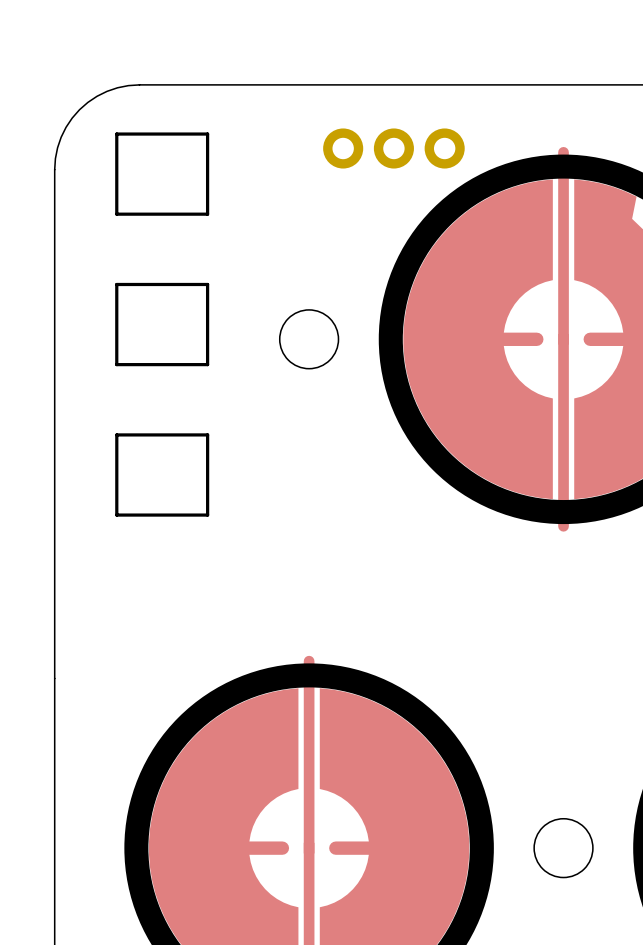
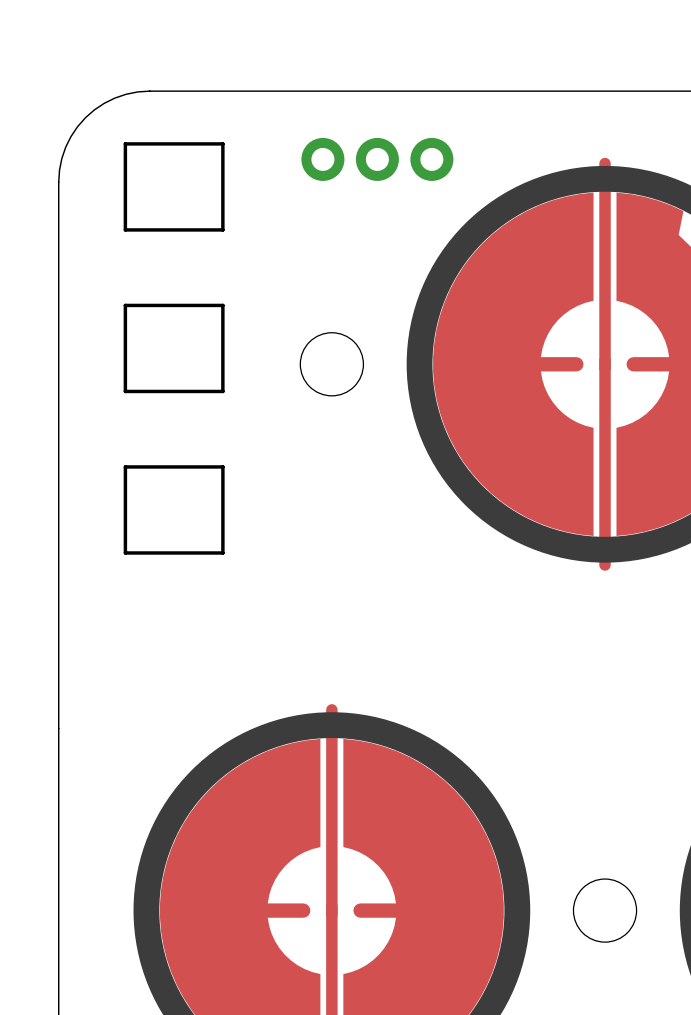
part position: (393, 148) -> (377, 159)

